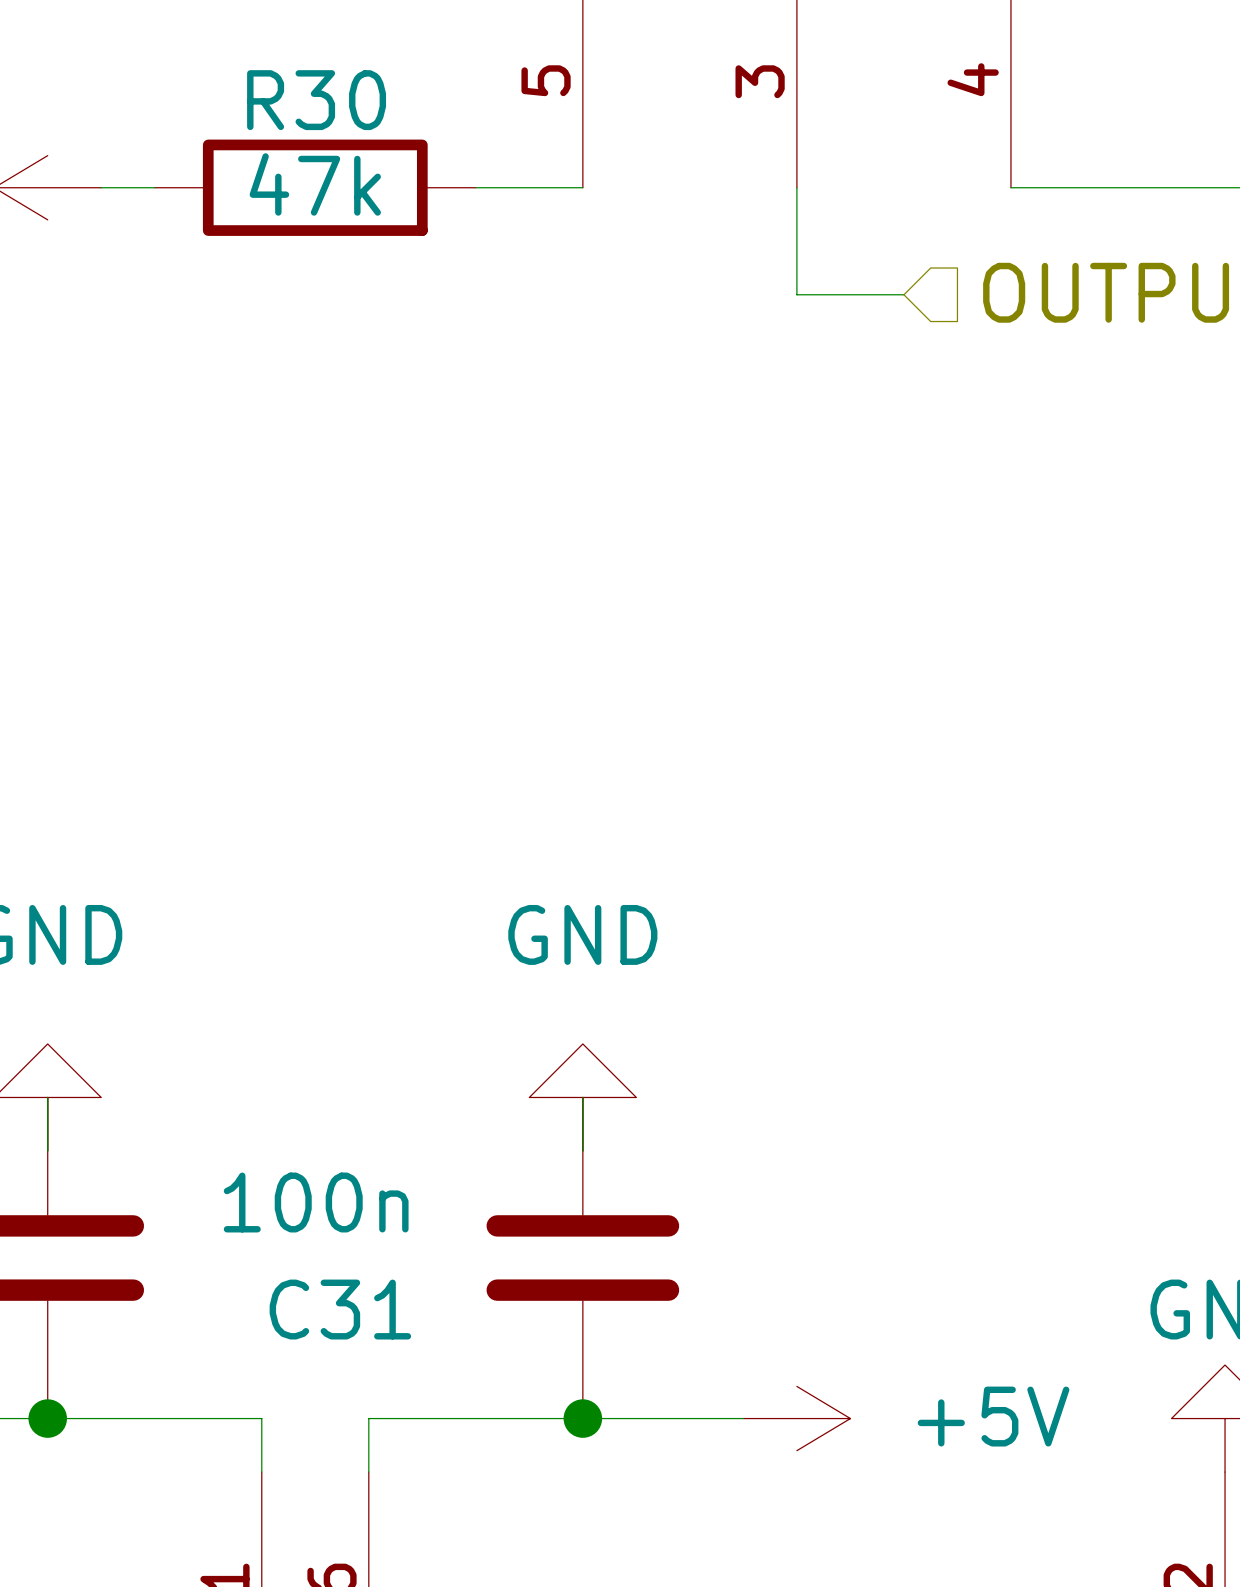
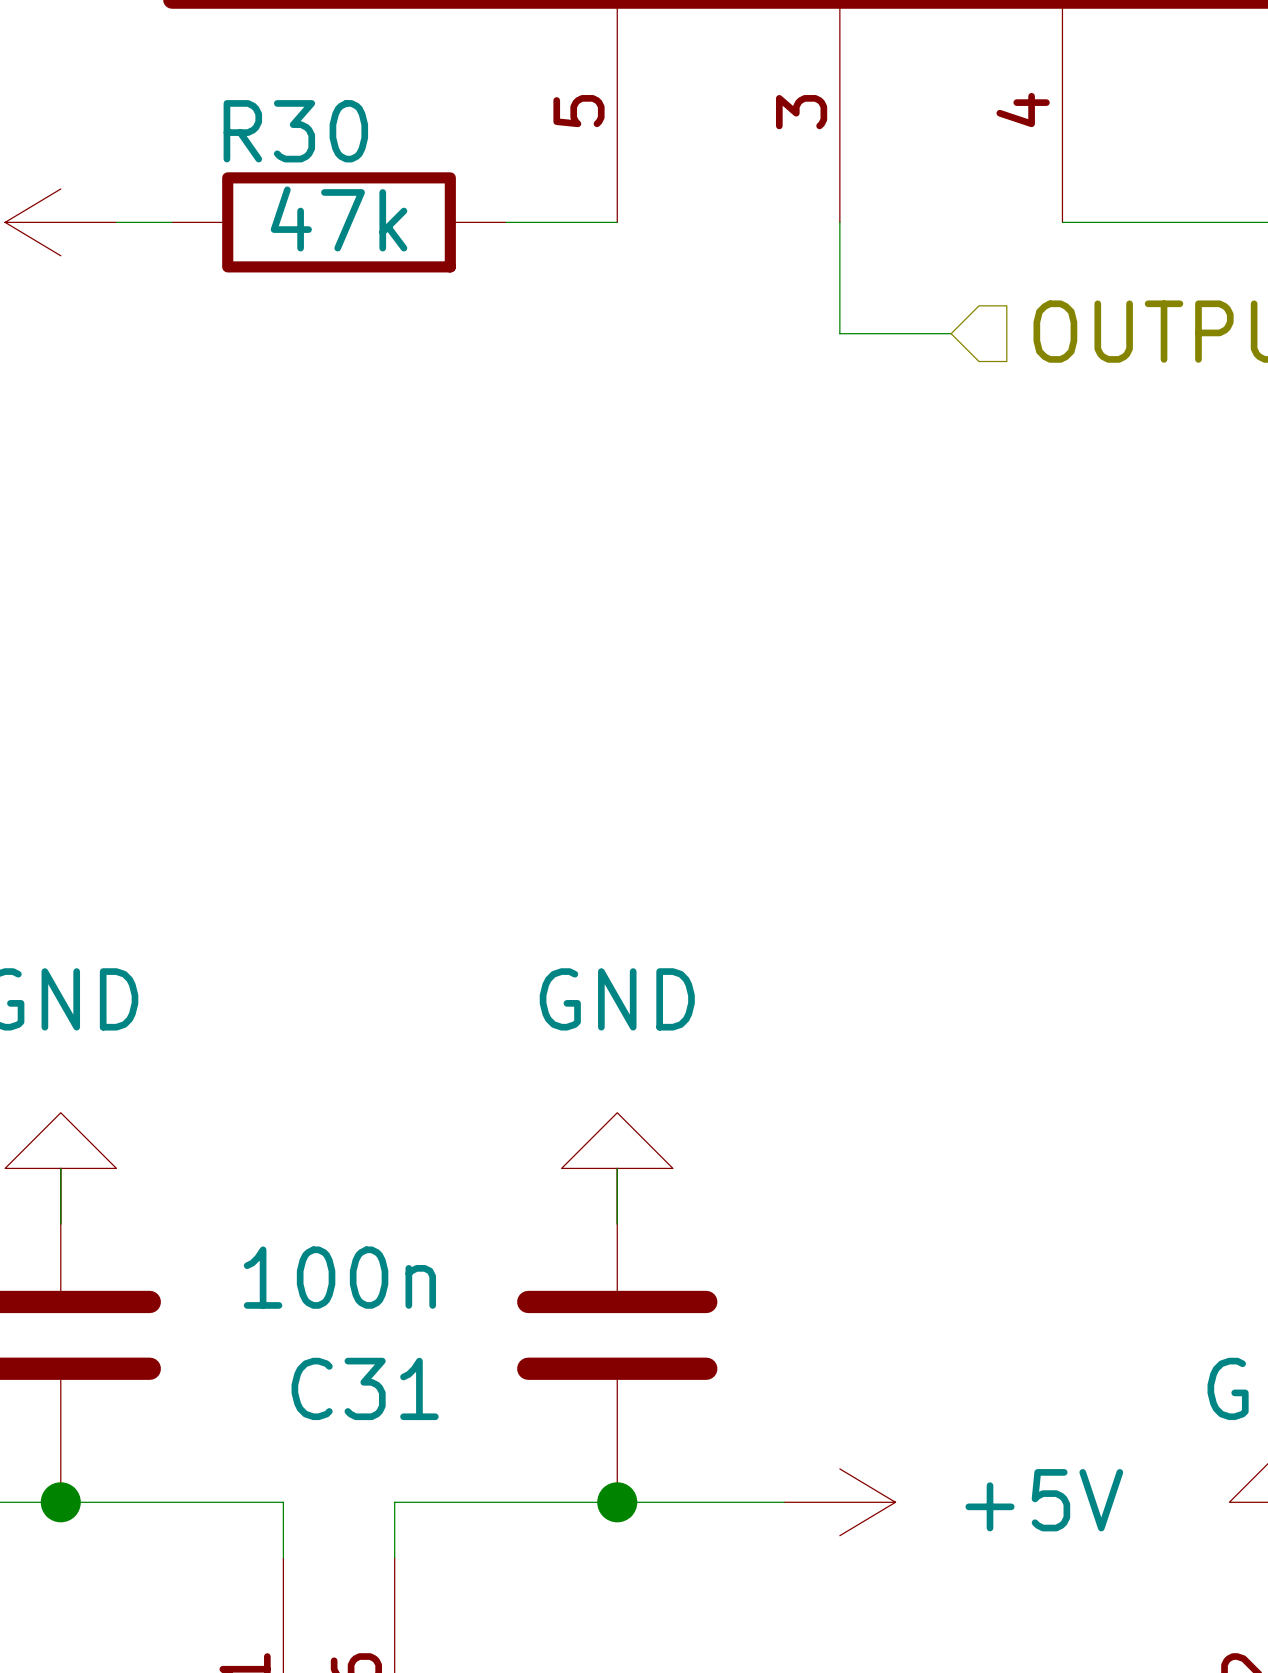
R30 name position: R30 (316, 100) -> R30 (295, 131)

